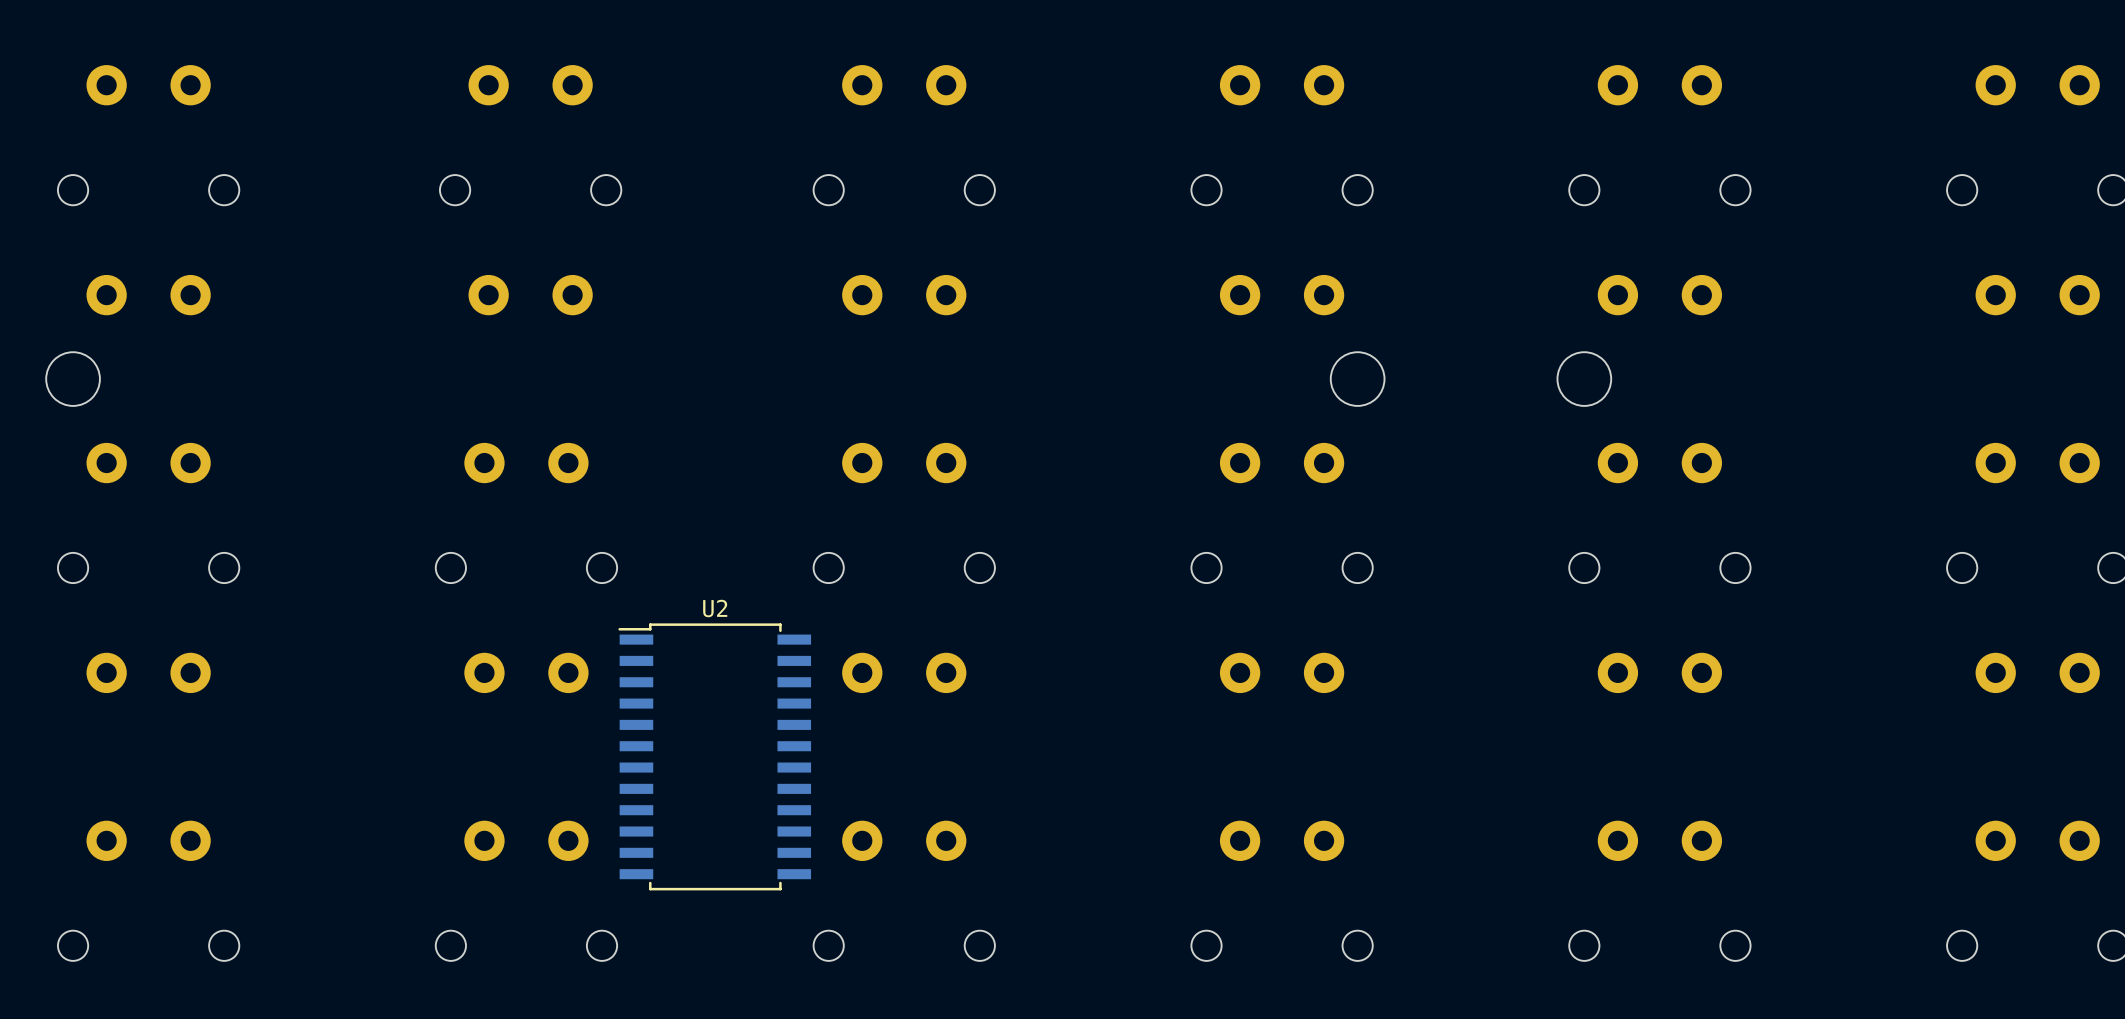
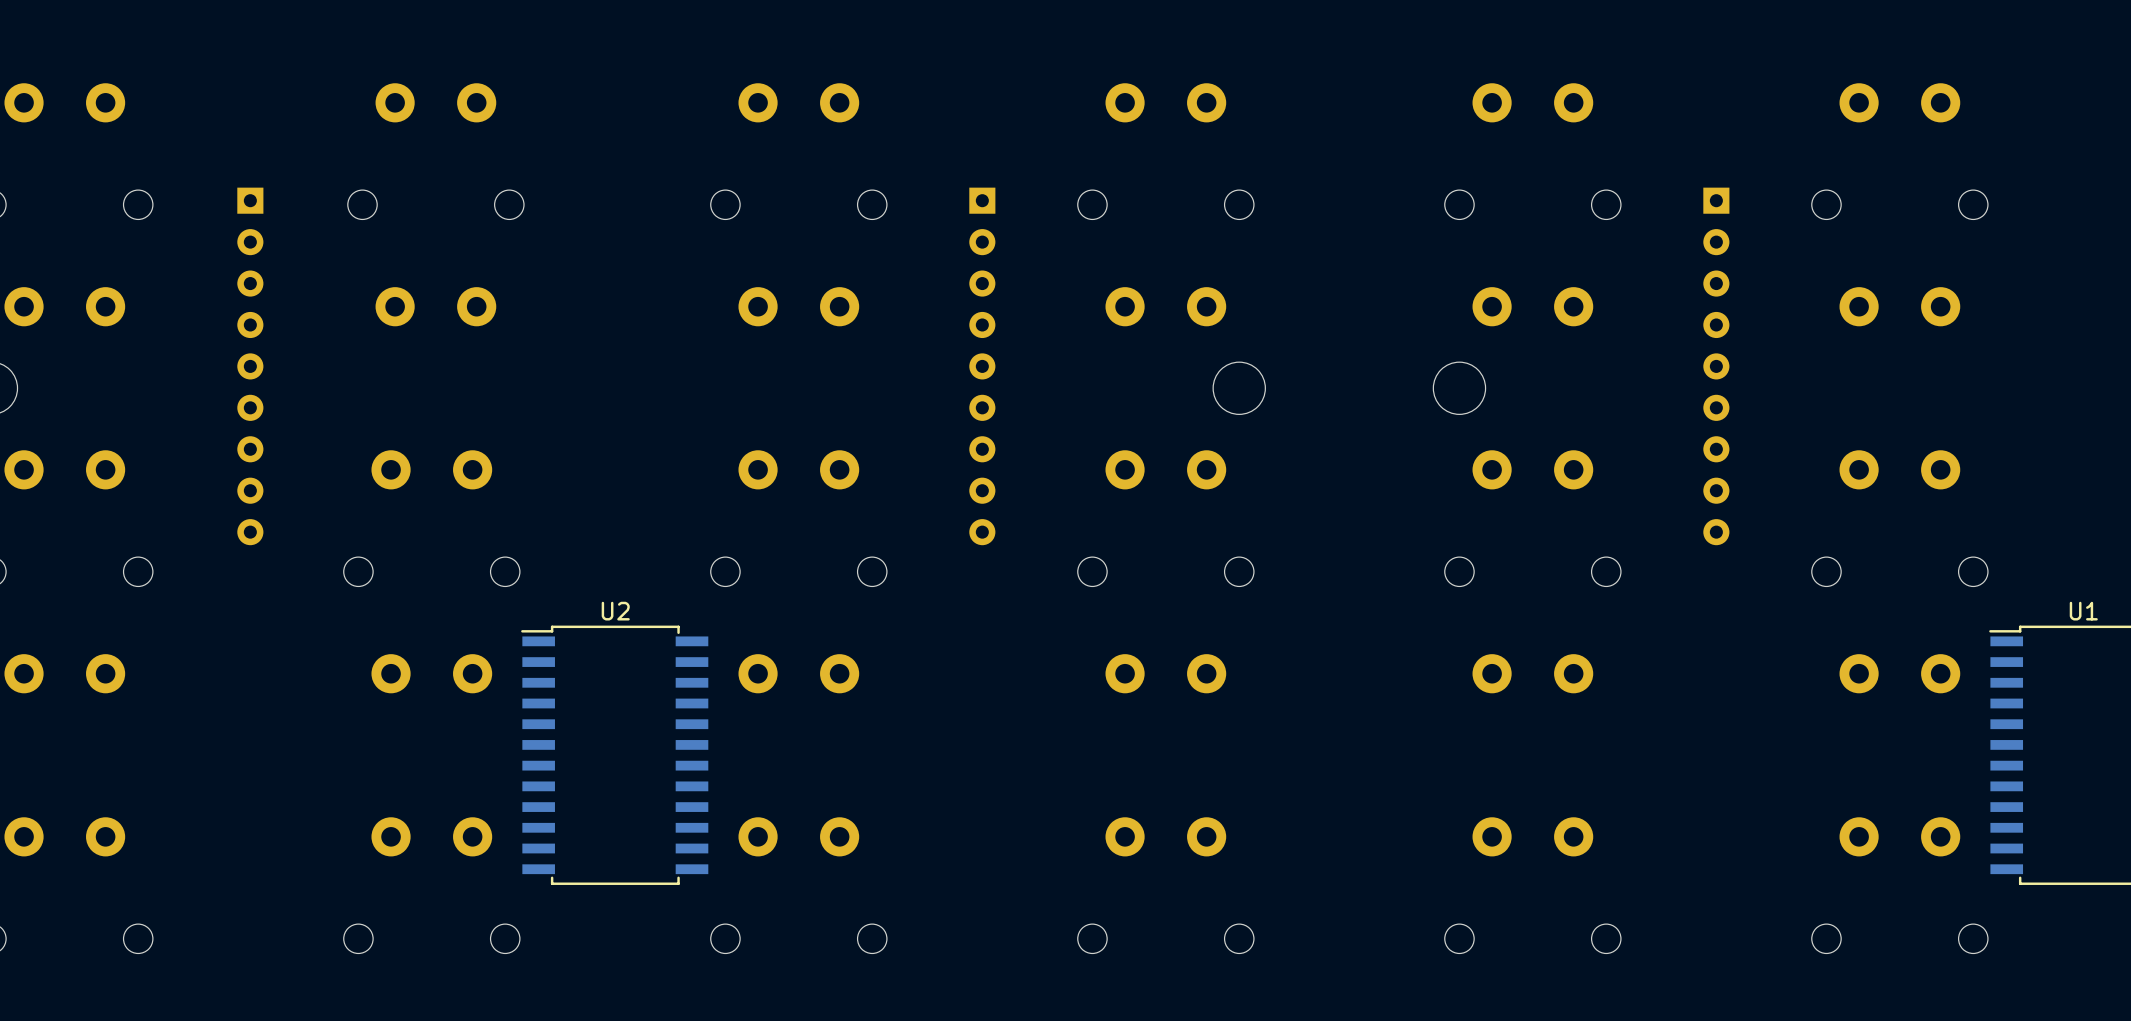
part: none -> (250, 366)
part: none -> (982, 366)
part: none -> (1716, 366)

